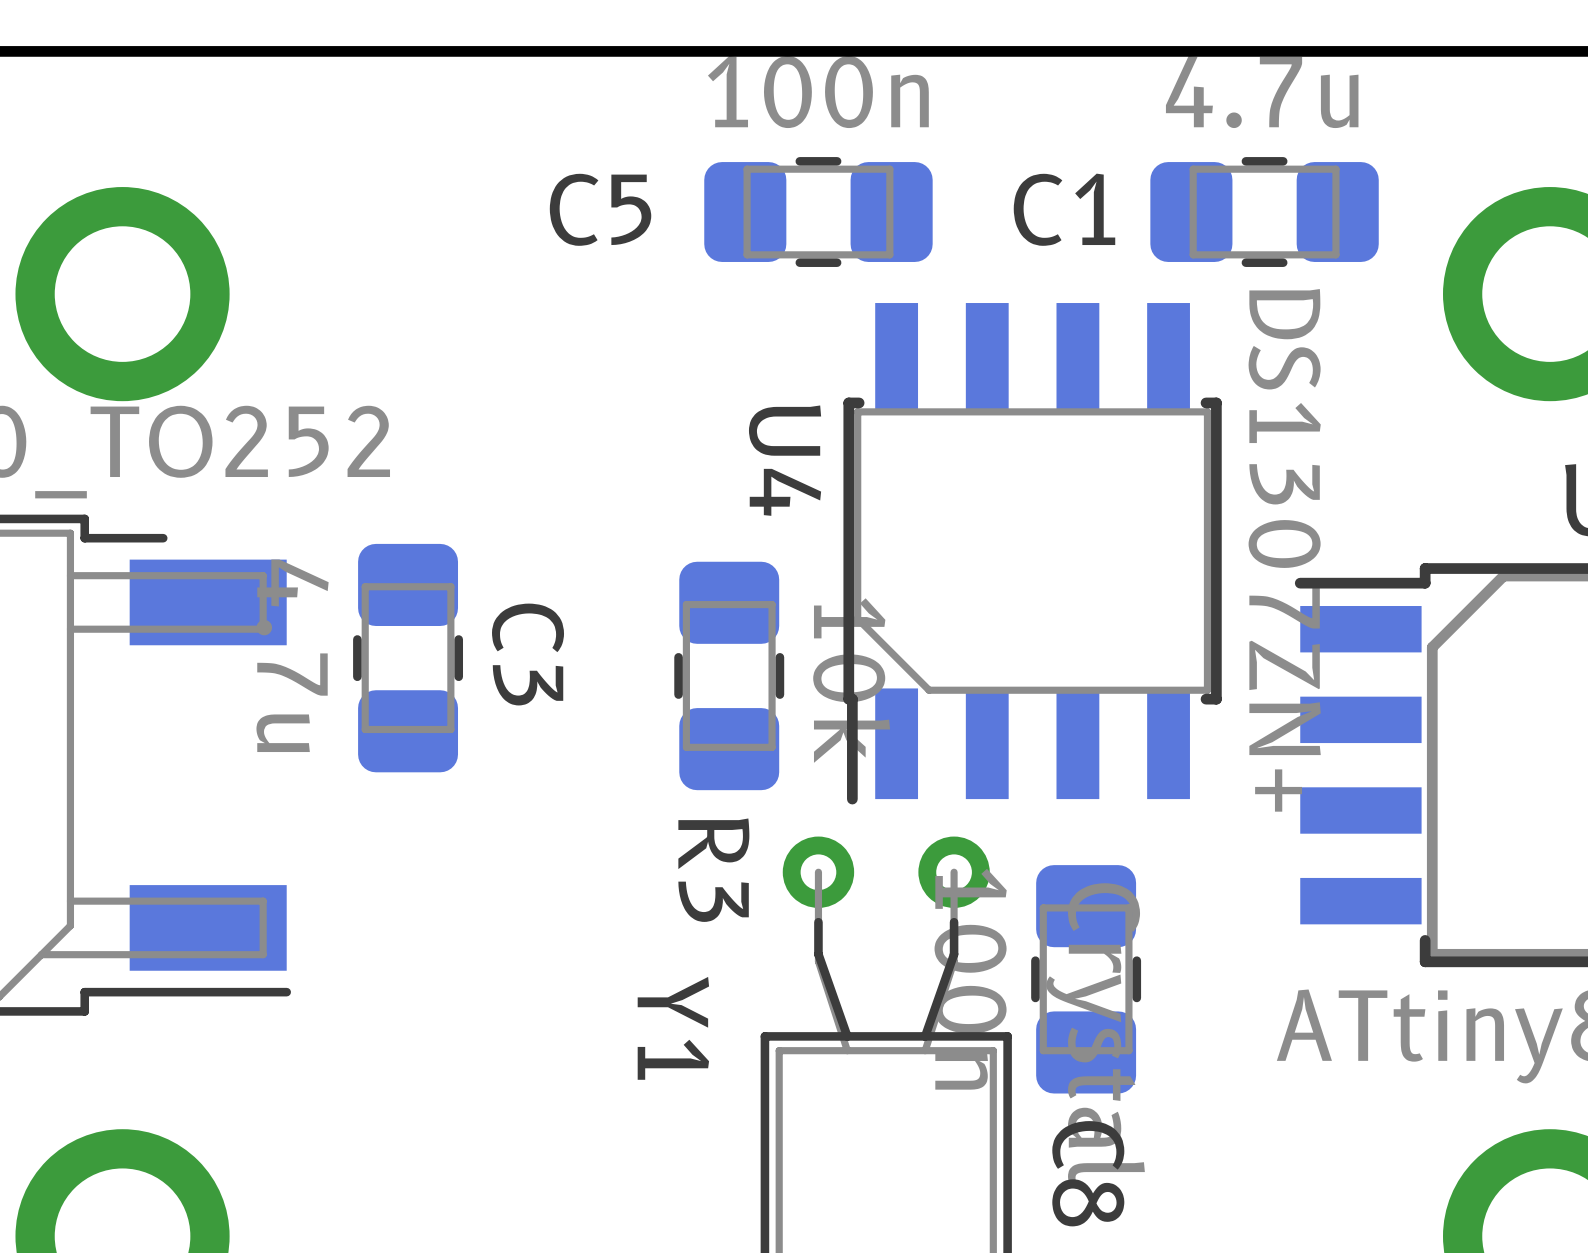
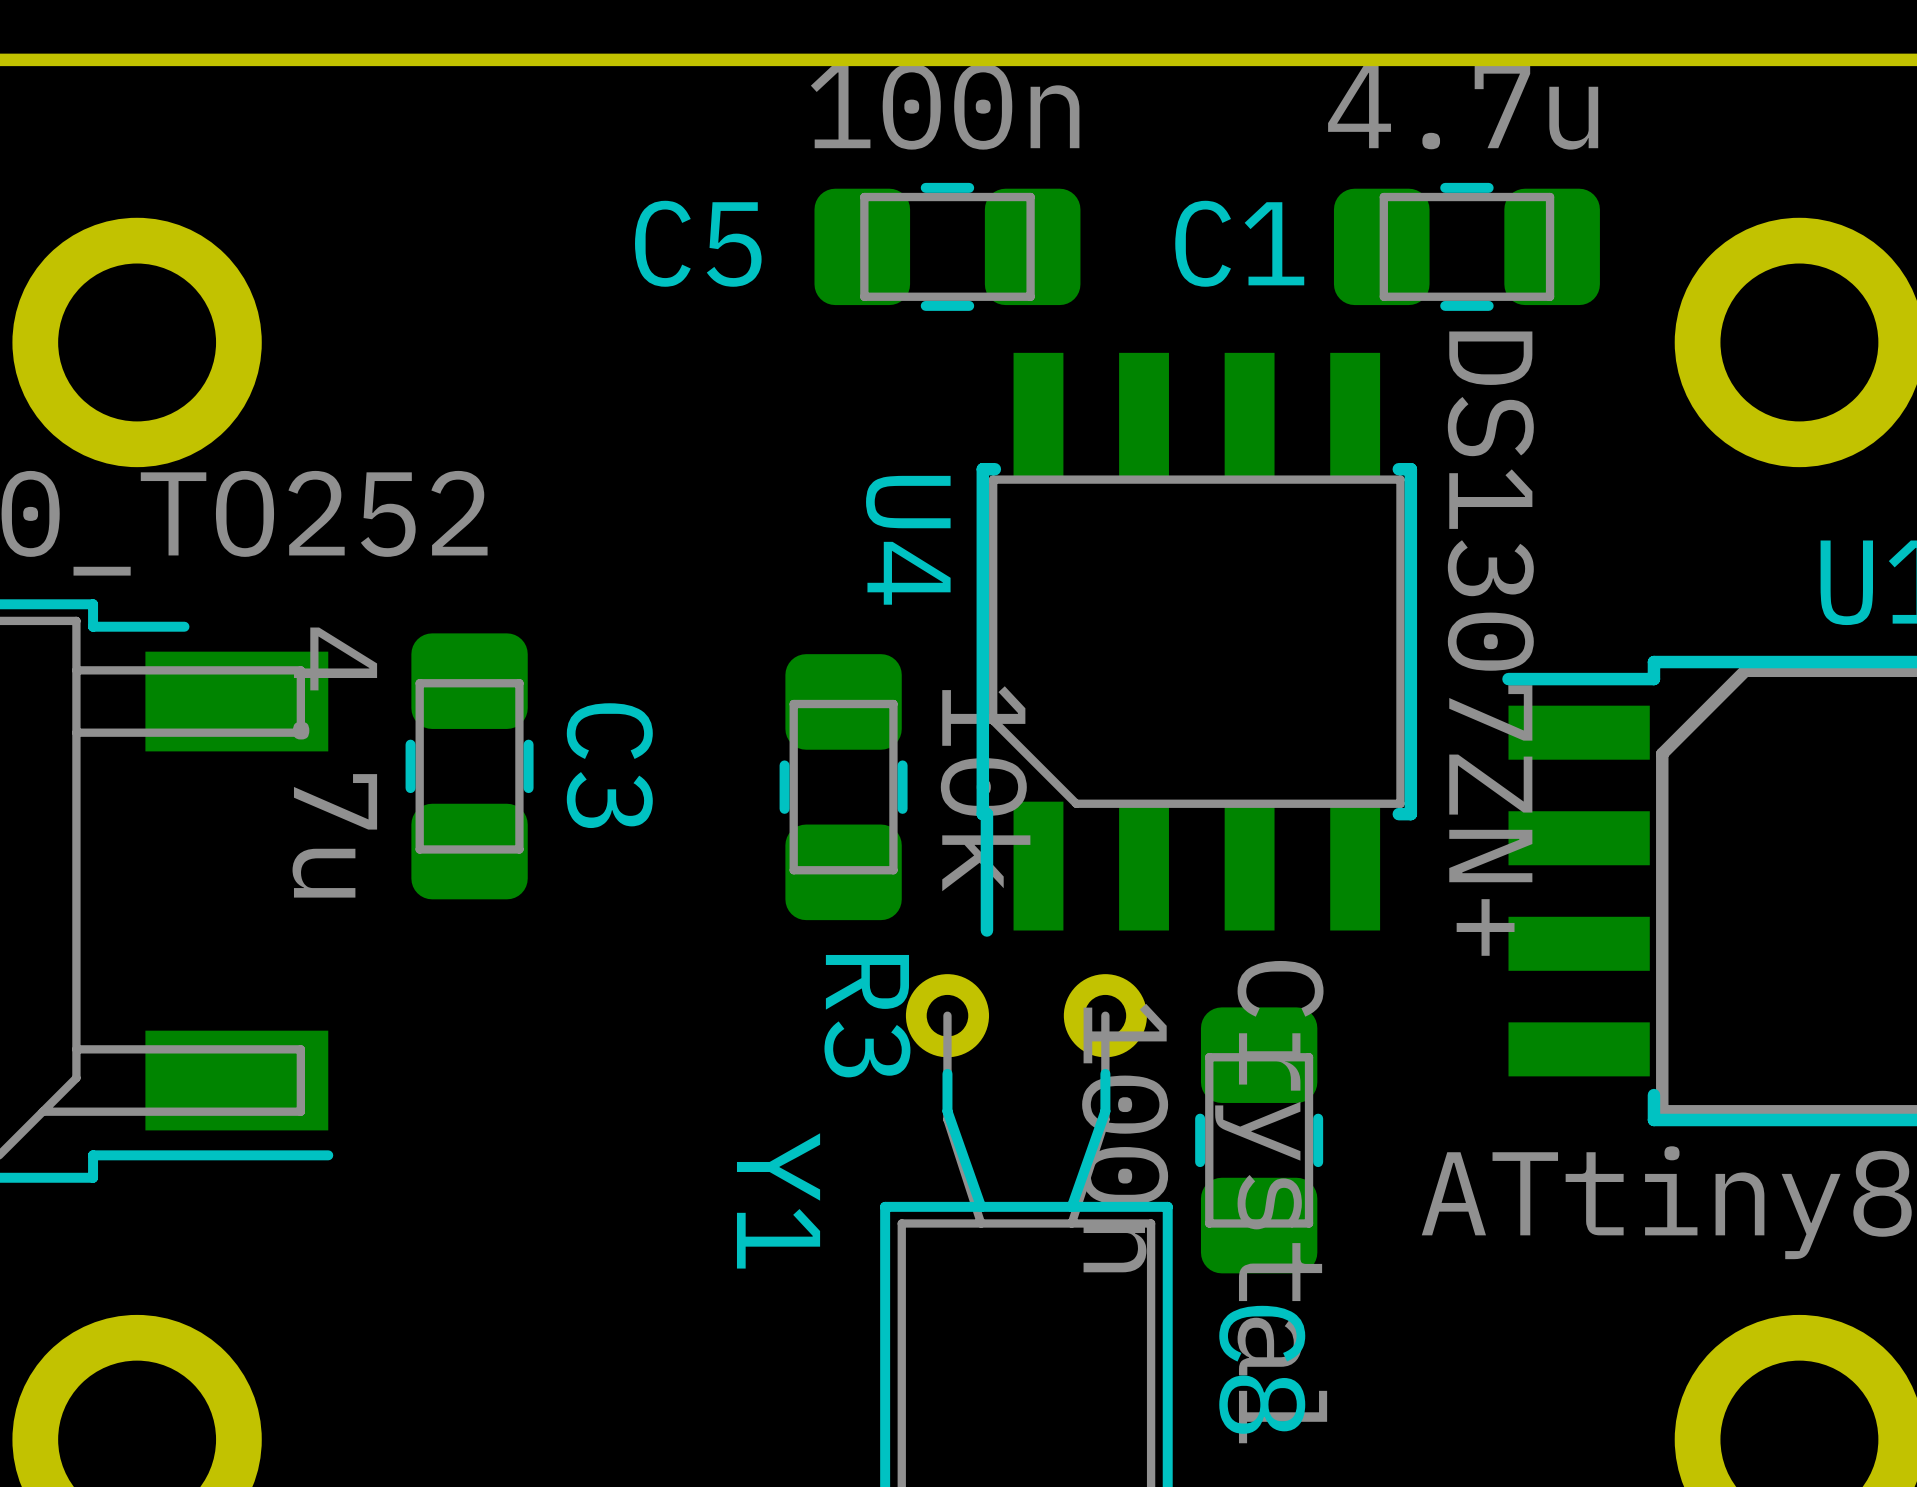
R3 name position: R3 (713, 870) -> R3 (867, 1016)

